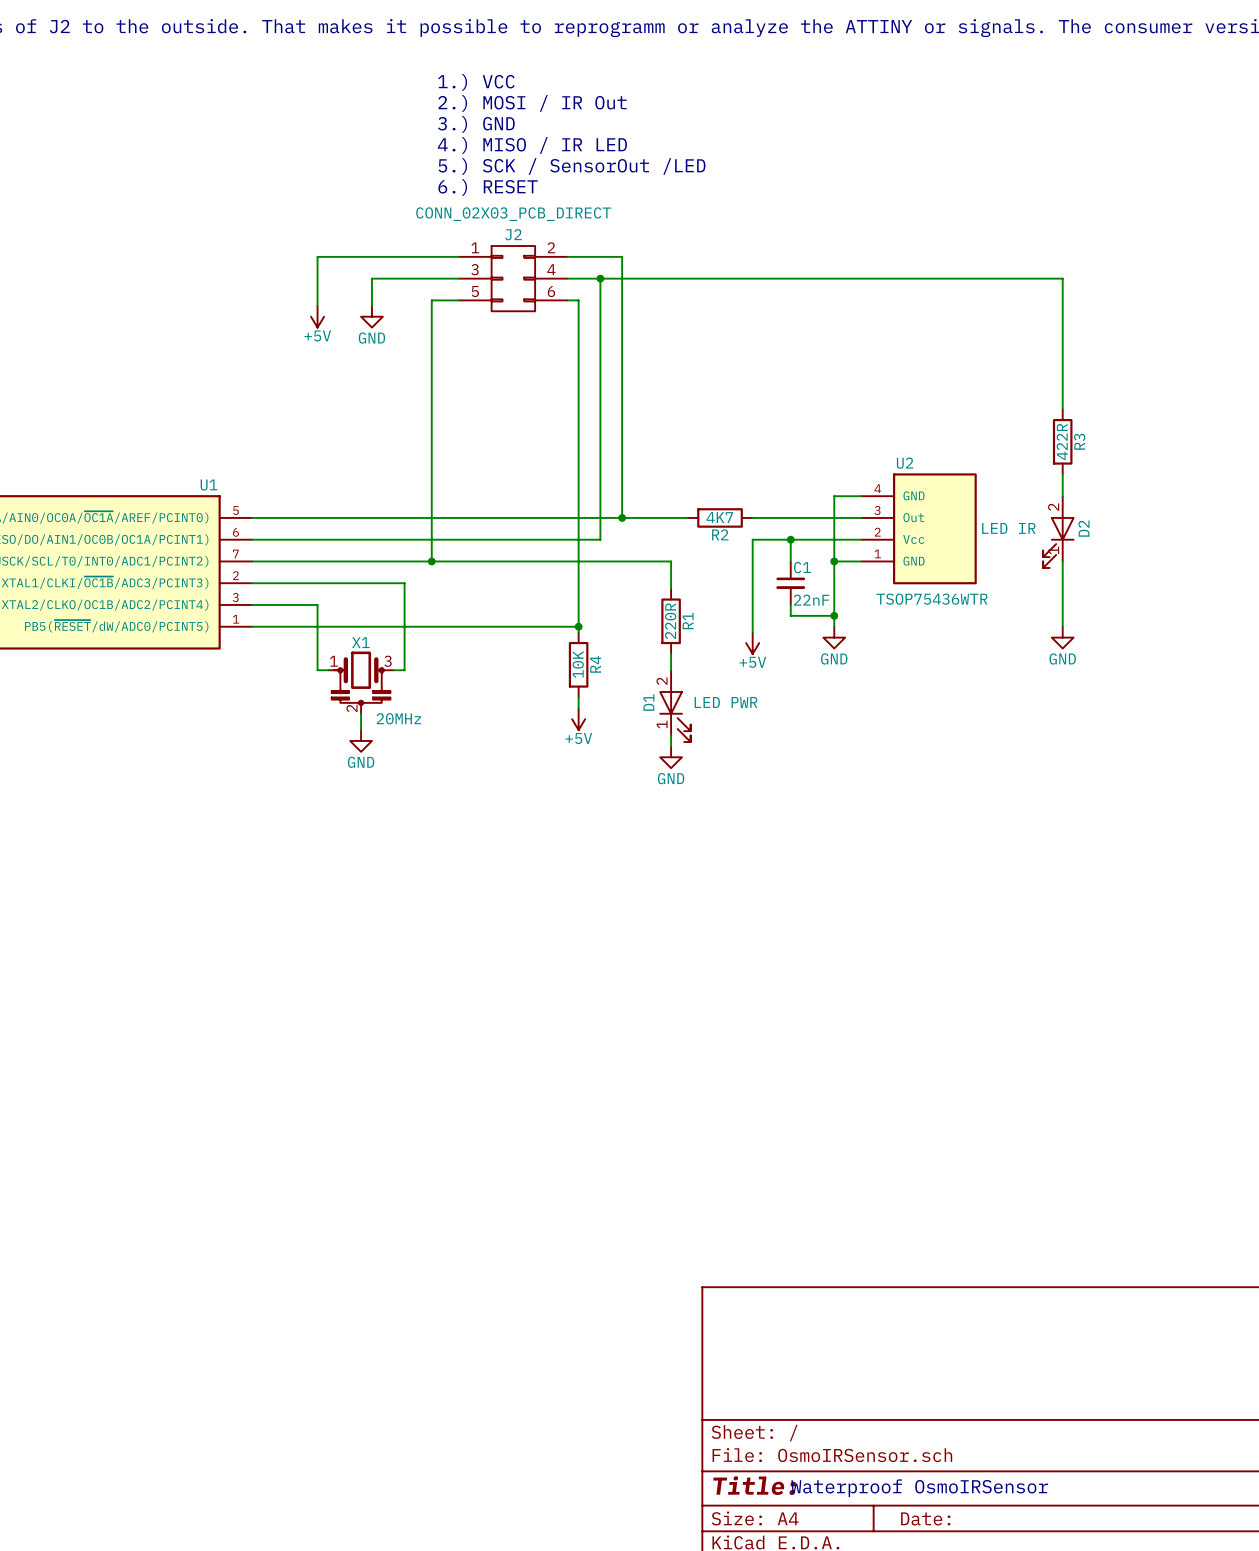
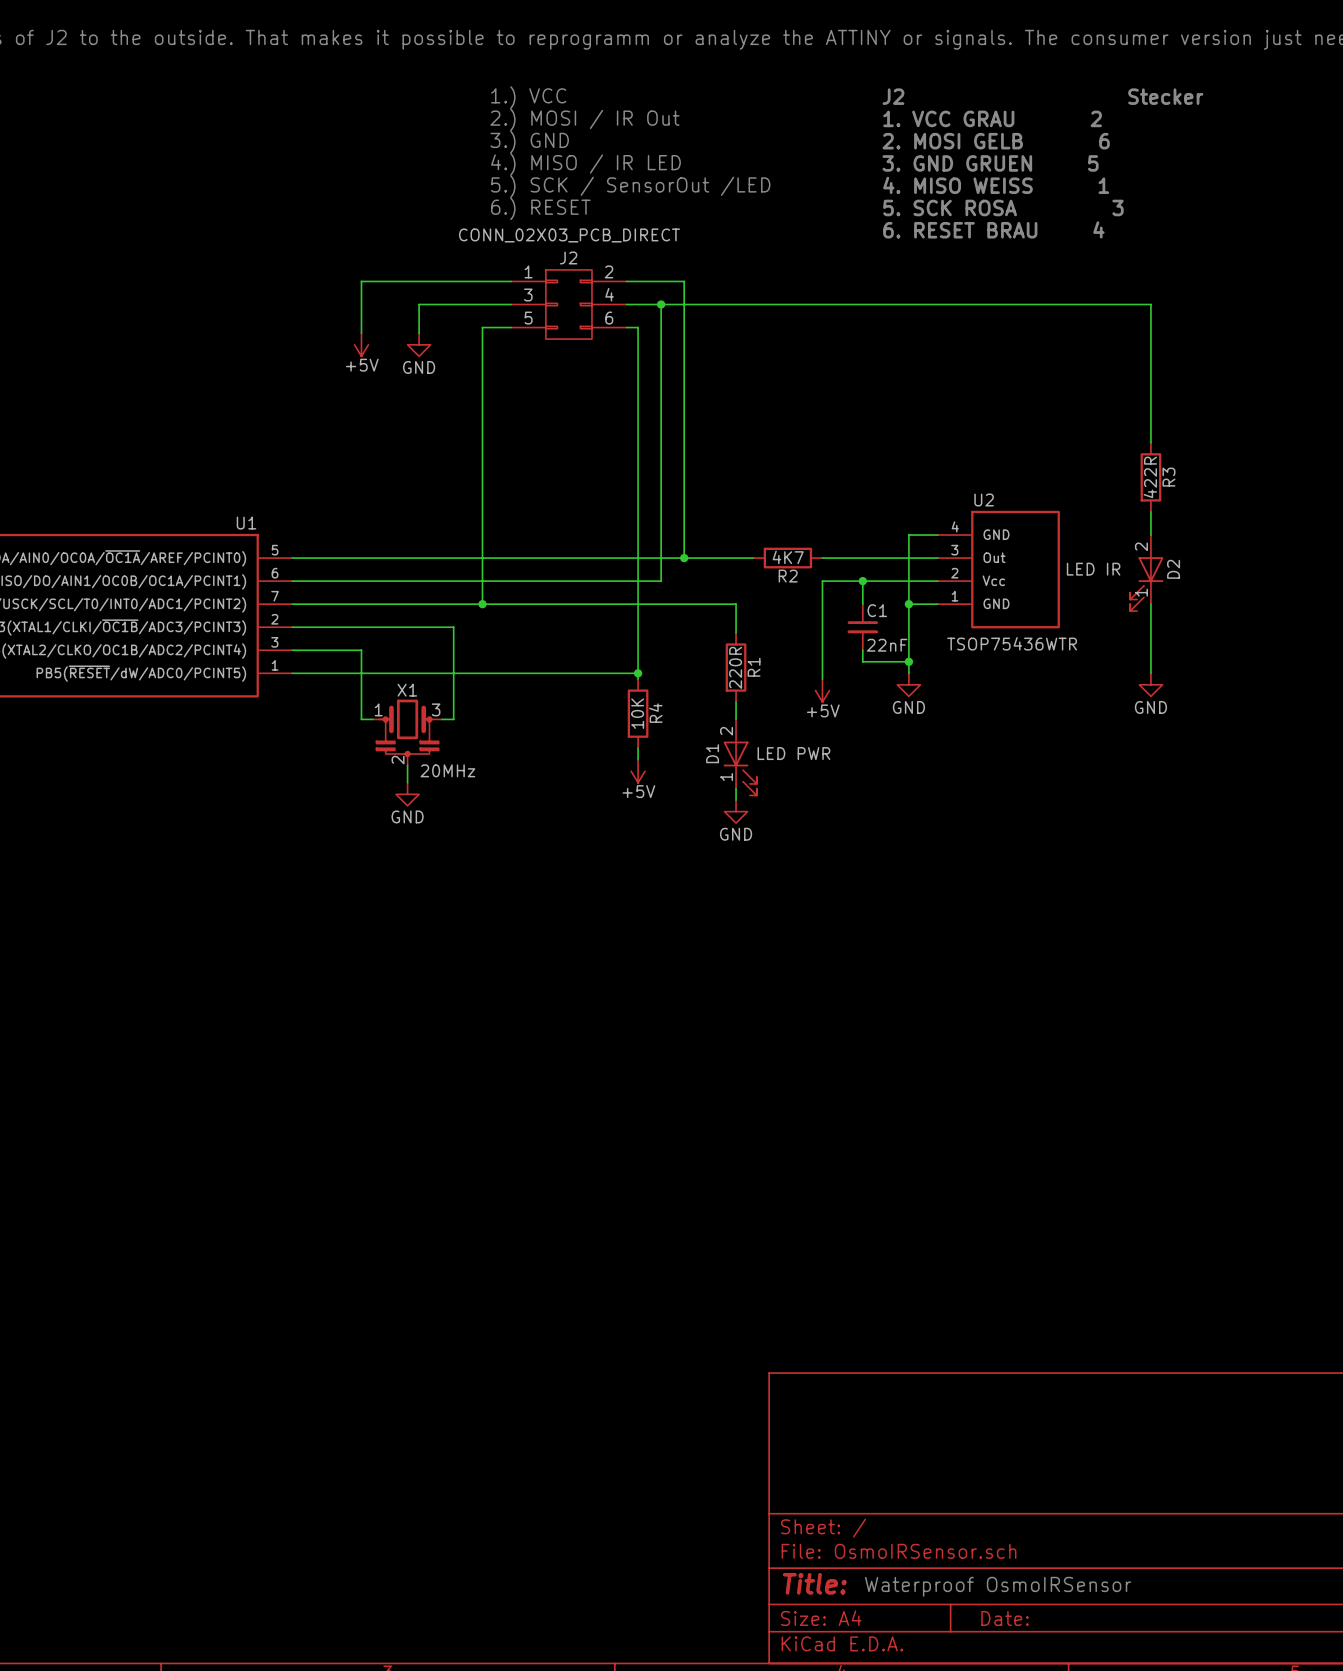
text: none -> J2 Stecker (1042, 96)
text: none -> 1. VCC GRAU 2 (992, 118)
text: none -> 2. MOSI GELB 6 (996, 141)
text: none -> 3. GND GRUEN 5 (990, 163)
text: none -> 4. MISO WEISS 1 (996, 185)
text: none -> 5. SCK ROSA 3 (1003, 207)
text: none -> 6. RESET BRAU 4 (993, 229)

